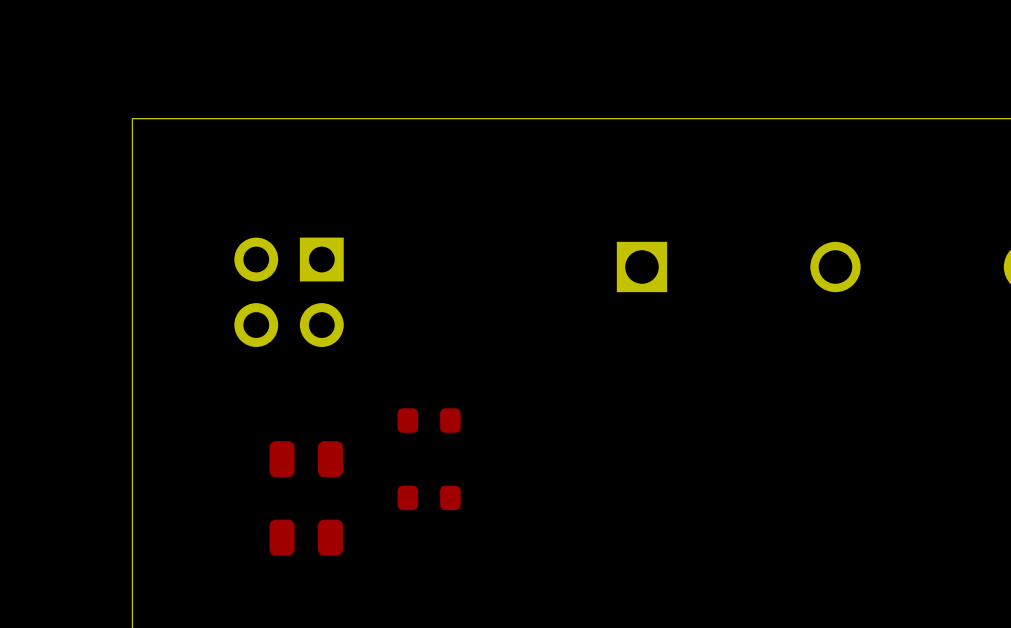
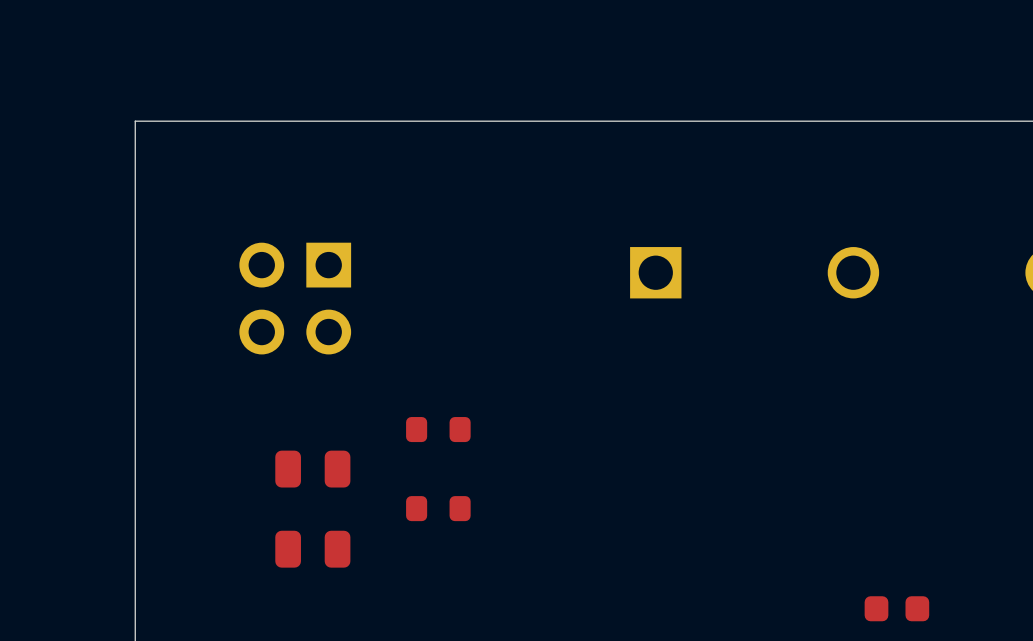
part: none -> (896, 608)

